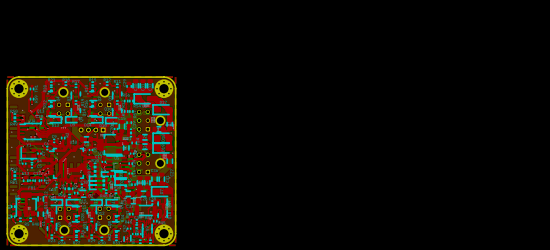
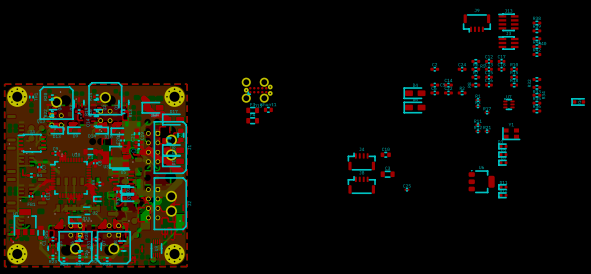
part: none -> (476, 23)
part: none -> (508, 22)
part: none -> (536, 22)
part: none -> (508, 42)
part: none -> (536, 54)
board edge: (18, 77) (163, 77) (172, 80) (175, 88) (175, 233) (172, 241) (163, 245) (18, 245) (10, 241) (7, 233) (7, 88) (10, 80) (18, 77) -> none
part footprint: [47, 81, 56, 86] -> [484, 129, 490, 133]
part footprint: [61, 81, 70, 86] -> [510, 83, 519, 87]
part footprint: [88, 81, 97, 86] -> [510, 75, 519, 80]
part footprint: [103, 81, 112, 86] -> [475, 129, 481, 133]
part: none -> (257, 90)
top track: (48, 83) (48, 88) (44, 93) (44, 102) (36, 109) (36, 115) -> none
top track: (90, 83) (90, 88) (87, 88) (78, 80) (46, 80) (45, 89) (42, 92) (42, 101) (33, 110) (30, 110) -> none
via: (100, 83) -> none
part footprint: [71, 84, 81, 88] -> [484, 111, 490, 114]
part footprint: [113, 84, 122, 88] -> [475, 123, 481, 127]
top track: (73, 85) (68, 83) (65, 87) (61, 87) (53, 97) (37, 110) (37, 115) -> none
top track: (78, 85) (78, 96) -> none
top track: (114, 85) (109, 83) (106, 87) (102, 87) (97, 92) (97, 95) (92, 95) (78, 81) (47, 81) (46, 89) (43, 92) (43, 102) (31, 111) -> none
top track: (119, 85) (119, 96) -> none
part: (135, 85) -> none
part: (142, 85) -> none
part: (150, 85) -> none
part: none -> (414, 93)
part: (129, 86) -> none
top track: (53, 88) (53, 93) -> none
top track: (95, 88) (94, 93) -> none
via: (114, 90) -> none
top track: (150, 90) (129, 89) (126, 92) (126, 98) -> none
top track: (32, 91) (32, 96) (29, 99) (29, 111) (35, 117) (44, 117) (50, 127) (61, 127) -> none
via: (87, 93) -> none
part: none -> (105, 102)
part: none -> (536, 103)
part: none -> (508, 104)
top track: (73, 96) (73, 109) (78, 113) -> none
top track: (114, 96) (114, 109) (119, 113) -> none
top track: (53, 98) (53, 108) -> none
part: none -> (56, 107)
top track: (94, 98) (94, 108) -> none
top track: (150, 98) (160, 101) (169, 110) (169, 119) -> none
part: none -> (414, 107)
part: (32, 99) -> none
part: none -> (268, 109)
top track: (32, 101) (32, 104) -> none
part: (63, 101) -> none
part: (104, 101) -> none
part: (126, 101) -> none
part: (131, 101) -> none
part: none -> (252, 110)
part: none -> (536, 111)
top track: (48, 103) (49, 116) -> none
top track: (90, 103) (90, 116) -> none
top track: (126, 103) (126, 108) (121, 115) (114, 116) (107, 124) (66, 124) (63, 127) -> none
top track: (131, 103) (129, 111) (125, 111) (121, 117) (115, 117) (107, 125) (67, 125) (65, 127) -> none
via: (32, 104) -> none
via: (79, 105) -> none
via: (119, 105) -> none
via: (120, 105) -> none
via: (77, 106) -> none
via: (79, 106) -> none
via: (84, 106) -> none
via: (120, 106) -> none
via: (79, 108) -> none
via: (119, 108) -> none
via: (120, 108) -> none
via: (77, 109) -> none
via: (79, 109) -> none
via: (119, 109) -> none
via: (120, 109) -> none
via: (30, 110) -> none
part: (75, 110) -> none
part: (117, 110) -> none
part: none -> (252, 120)
via: (31, 111) -> none
part: (126, 111) -> none
part: (131, 111) -> none
top track: (12, 112) (12, 119) -> none
via: (12, 112) -> none
bottom track: (74, 114) (74, 132) (99, 156) (99, 188) (107, 196) (102, 196) (91, 207) -> none
top track: (131, 114) (132, 122) (128, 126) (128, 135) -> none
part: (14, 115) -> none
top track: (17, 115) (24, 117) (24, 121) (19, 124) (19, 137) (24, 143) (52, 143) (56, 150) (64, 150) (64, 146) -> none
via: (36, 115) -> none
via: (37, 115) -> none
via: (46, 116) -> none
via: (47, 116) -> none
via: (87, 116) -> none
via: (89, 116) -> none
via: (79, 117) -> none
via: (151, 117) -> none
via: (153, 117) -> none
via: (154, 117) -> none
part footprint: [37, 118, 46, 123] -> [497, 67, 506, 72]
part: (14, 119) -> none
top track: (21, 119) (21, 121) (17, 124) (17, 138) (23, 144) (51, 144) (56, 151) (64, 151) (66, 146) -> none
top track: (22, 119) (17, 119) -> none
via: (22, 119) -> none
via: (79, 119) -> none
part footprint: [119, 119, 125, 133] -> [485, 75, 493, 79]
via: (151, 119) -> none
via: (153, 119) -> none
via: (154, 119) -> none
top track: (43, 120) (43, 125) (47, 128) -> none
part: (150, 120) -> none
via: (151, 120) -> none
via: (153, 120) -> none
via: (154, 120) -> none
top track: (29, 122) (25, 125) -> none
via: (151, 122) -> none
via: (154, 122) -> none
via: (47, 123) -> none
via: (49, 123) -> none
via: (89, 123) -> none
via: (90, 123) -> none
via: (93, 123) -> none
via: (169, 124) -> none
via: (170, 124) -> none
via: (173, 124) -> none
top track: (22, 125) (35, 125) (40, 131) (67, 129) (77, 139) (77, 146) -> none
via: (169, 125) -> none
via: (170, 125) -> none
via: (173, 125) -> none
via: (61, 127) -> none
via: (63, 127) -> none
via: (65, 127) -> none
via: (173, 127) -> none
via: (47, 128) -> none
via: (158, 128) -> none
via: (173, 128) -> none
top track: (22, 129) (34, 129) (39, 135) (47, 135) (50, 131) (66, 131) (69, 134) (69, 146) -> none
via: (27, 129) -> none
top track: (36, 129) (39, 133) (47, 133) (50, 130) (67, 130) (70, 134) (70, 146) -> none
via: (36, 129) -> none
top track: (163, 129) (163, 132) (169, 138) (169, 148) -> none
top track: (88, 130) (84, 141) (79, 146) -> none
part: (92, 130) -> none
top track: (95, 130) (86, 137) (86, 142) (81, 146) (81, 154) (84, 155) -> none
top track: (116, 131) (113, 133) -> none
via: (171, 132) -> none
top track: (36, 134) (39, 137) (46, 137) (51, 132) (66, 132) (67, 146) -> none
via: (36, 134) -> none
via: (95, 134) -> none
via: (100, 134) -> none
via: (102, 134) -> none
via: (100, 135) -> none
via: (102, 135) -> none
part: none -> (166, 147)
top track: (31, 136) (34, 136) -> none
via: (34, 136) -> none
part: (144, 137) -> none
top track: (31, 138) (34, 138) -> none
part rotation: 0° (63, 138) -> 90° clockwise (462, 92)
part position: (63, 138) -> (462, 92)
via: (123, 138) -> none
via: (126, 138) -> none
part footprint: [131, 138, 137, 148] -> [457, 67, 467, 72]
via: (123, 139) -> none
via: (124, 139) -> none
via: (126, 139) -> none
via: (127, 139) -> none
top track: (48, 140) (51, 140) (57, 146) -> none
via: (48, 140) -> none
part footprint: [123, 141, 130, 155] -> [444, 83, 453, 87]
part: none -> (503, 154)
via: (122, 143) -> none
top track: (126, 143) (100, 144) -> none
part footprint: [138, 143, 152, 150] -> [404, 188, 410, 192]
via: (95, 144) -> none
via: (122, 144) -> none
top track: (42, 145) (49, 152) (52, 152) -> none
top track: (23, 146) (19, 145) (17, 147) (17, 164) (26, 173) (41, 174) -> none
via: (23, 146) -> none
top track: (75, 146) (74, 150) (70, 150) (59, 161) (59, 172) (50, 181) (41, 180) (37, 188) (21, 188) (18, 191) (18, 199) -> none
top track: (76, 146) (74, 151) (71, 151) (60, 161) (60, 172) (44, 189) (21, 189) (19, 191) (18, 202) -> none
top track: (21, 147) (18, 148) (18, 164) (26, 172) (42, 172) -> none
via: (83, 147) -> none
via: (124, 147) -> none
via: (125, 147) -> none
part position: (47, 148) -> (434, 92)
part: none -> (361, 161)
via: (52, 149) -> none
top track: (33, 150) (38, 150) (46, 158) (52, 158) -> none
via: (84, 150) -> none
via: (134, 150) -> none
via: (136, 151) -> none
part position: (28, 153) -> (511, 133)
part rotation: 0° (132, 153) -> 90° clockwise (448, 92)
part position: (132, 153) -> (448, 92)
via: (172, 153) -> none
via: (89, 154) -> none
top track: (147, 154) (142, 159) (135, 159) (130, 166) (124, 165) -> none
top track: (129, 155) (132, 156) -> none
via: (129, 155) -> none
top track: (139, 155) (143, 154) (144, 156) (132, 161) (124, 161) -> none
via: (163, 155) -> none
via: (164, 155) -> none
via: (166, 155) -> none
top track: (84, 156) (109, 157) -> none
via: (129, 156) -> none
via: (163, 156) -> none
via: (164, 156) -> none
via: (166, 156) -> none
part footprint: [102, 157, 106, 166] -> [497, 59, 506, 64]
top track: (55, 158) (55, 161) (52, 162) -> none
via: (55, 158) -> none
top track: (65, 158) (66, 179) -> none
via: (65, 158) -> none
top track: (84, 158) (96, 158) (104, 168) (109, 168) -> none
via: (163, 158) -> none
via: (164, 158) -> none
via: (166, 158) -> none
part footprint: [22, 159, 26, 168] -> [380, 171, 395, 178]
top track: (52, 159) (34, 161) -> none
top track: (57, 159) (54, 164) (52, 164) -> none
via: (57, 159) -> none
top track: (64, 160) (64, 179) -> none
via: (64, 160) -> none
top track: (52, 161) (39, 161) (34, 166) -> none
top track: (63, 161) (61, 179) -> none
via: (63, 161) -> none
top track: (84, 161) (90, 161) (91, 165) -> none
part: (169, 161) -> none
top track: (84, 162) (88, 162) (92, 169) -> none
via: (88, 162) -> none
part footprint: [91, 163, 100, 167] -> [510, 67, 519, 72]
via: (113, 163) -> none
via: (115, 163) -> none
via: (116, 163) -> none
top track: (120, 163) (121, 168) (128, 168) (130, 171) -> none
part rotation: 0° (130, 163) -> 90° clockwise (536, 30)
part position: (130, 163) -> (536, 30)
part: (150, 163) -> none
top track: (84, 164) (81, 164) (77, 168) (67, 168) -> none
top track: (84, 165) (81, 165) (77, 169) (67, 170) -> none
part position: (31, 166) -> (434, 85)
bottom track: (56, 166) (56, 185) (53, 191) (22, 222) (15, 222) -> none
via: (104, 166) -> none
via: (113, 166) -> none
part: none -> (481, 181)
top track: (84, 167) (67, 171) -> none
via: (113, 167) -> none
via: (11, 168) -> none
via: (47, 168) -> none
via: (67, 168) -> none
top track: (84, 168) (67, 173) -> none
via: (27, 169) -> none
via: (43, 169) -> none
top track: (52, 169) (47, 169) (43, 174) (43, 177) (31, 177) -> none
part footprint: [128, 169, 133, 178] -> [485, 83, 493, 87]
top track: (12, 170) (12, 177) -> none
via: (12, 170) -> none
via: (67, 170) -> none
via: (81, 170) -> none
via: (105, 170) -> none
part: none -> (361, 185)
via: (39, 171) -> none
via: (48, 171) -> none
via: (67, 171) -> none
via: (42, 172) -> none
via: (80, 172) -> none
part: (14, 173) -> none
top track: (17, 173) (22, 174) -> none
via: (46, 173) -> none
via: (48, 173) -> none
via: (67, 173) -> none
part position: (95, 173) -> (475, 85)
via: (41, 174) -> none
via: (69, 174) -> none
part position: (105, 174) -> (503, 146)
part footprint: [23, 175, 29, 186] -> [485, 67, 493, 72]
part footprint: [35, 176, 40, 186] -> [485, 59, 493, 64]
part: (14, 177) -> none
top track: (22, 177) (17, 177) -> none
via: (22, 177) -> none
via: (169, 177) -> none
part: (93, 178) -> none
top track: (96, 178) (101, 178) -> none
part: (103, 178) -> none
top track: (106, 178) (106, 188) (103, 191) -> none
top track: (57, 179) (55, 180) -> none
top track: (60, 179) (60, 188) -> none
top track: (63, 179) (64, 198) (89, 197) (95, 191) (100, 196) (112, 196) (120, 185) (133, 187) -> none
top track: (70, 179) (72, 175) (80, 175) (87, 183) (90, 189) (97, 189) (101, 193) (113, 191) -> none
top track: (72, 179) (72, 176) (80, 176) (86, 184) (86, 191) -> none
top track: (79, 179) (84, 184) (82, 187) -> none
part: (154, 179) -> none
part: (161, 179) -> none
via: (55, 180) -> none
via: (128, 181) -> none
via: (129, 181) -> none
top track: (31, 182) (21, 184) -> none
via: (46, 182) -> none
top track: (96, 182) (101, 182) -> none
part: (103, 182) -> none
via: (109, 182) -> none
via: (139, 182) -> none
part: (140, 182) -> none
via: (140, 182) -> none
part: (147, 182) -> none
via: (66, 183) -> none
via: (71, 183) -> none
via: (74, 183) -> none
via: (76, 183) -> none
via: (139, 183) -> none
via: (140, 183) -> none
top track: (161, 183) (166, 183) (172, 189) (172, 213) (153, 229) (153, 241) -> none
part footprint: [77, 184, 86, 188] -> [380, 152, 391, 158]
via: (111, 184) -> none
via: (112, 184) -> none
part: (133, 184) -> none
part: (56, 185) -> none
via: (112, 185) -> none
via: (76, 186) -> none
part footprint: [151, 186, 172, 197] -> [498, 160, 508, 166]
part: (93, 187) -> none
top track: (96, 187) (101, 187) -> none
part: (103, 187) -> none
via: (112, 187) -> none
part: none -> (166, 203)
via: (60, 188) -> none
part rotation: 0° (66, 188) -> 90° clockwise (475, 69)
part position: (66, 188) -> (475, 69)
part rotation: 0° (71, 188) -> 90° clockwise (475, 77)
part position: (71, 188) -> (475, 77)
via: (111, 188) -> none
via: (112, 188) -> none
part: (125, 188) -> none
top track: (82, 189) (82, 193) (80, 193) -> none
via: (136, 189) -> none
via: (51, 190) -> none
top track: (80, 191) (75, 196) (71, 196) -> none
part: (106, 191) -> none
part: (115, 191) -> none
top track: (118, 191) (125, 201) (125, 207) (129, 211) (129, 219) (133, 224) (145, 225) (146, 222) -> none
part footprint: [37, 192, 44, 206] -> [430, 67, 440, 72]
via: (61, 192) -> none
via: (60, 193) -> none
part: (76, 193) -> none
top track: (111, 193) (101, 195) (96, 190) (91, 190) (86, 193) -> none
via: (111, 193) -> none
part: (128, 193) -> none
part: (143, 193) -> none
top track: (52, 194) (26, 194) (26, 213) -> none
via: (52, 194) -> none
top track: (83, 194) (80, 195) -> none
via: (83, 194) -> none
top track: (90, 194) (86, 195) -> none
top track: (44, 196) (45, 236) (52, 238) (57, 236) (59, 238) -> none
via: (44, 196) -> none
top track: (46, 196) (46, 221) (60, 235) (76, 235) (79, 238) (79, 233) -> none
via: (46, 196) -> none
top track: (53, 196) (61, 196) (65, 201) (65, 218) (72, 225) (76, 225) (79, 222) (89, 222) (100, 235) (116, 235) (119, 238) (119, 233) -> none
via: (64, 196) -> none
part: (69, 196) -> none
top track: (52, 197) (61, 198) (64, 201) (64, 219) (71, 226) (76, 226) (87, 238) (94, 236) (99, 238) -> none
via: (52, 197) -> none
via: (114, 197) -> none
via: (116, 197) -> none
via: (117, 197) -> none
via: (119, 197) -> none
via: (133, 197) -> none
via: (134, 197) -> none
via: (136, 197) -> none
via: (137, 197) -> none
via: (139, 197) -> none
via: (140, 197) -> none
via: (40, 198) -> none
via: (114, 198) -> none
via: (117, 198) -> none
via: (124, 198) -> none
via: (126, 198) -> none
via: (18, 199) -> none
part footprint: [50, 199, 63, 206] -> [498, 184, 508, 190]
via: (78, 199) -> none
via: (79, 199) -> none
part footprint: [90, 199, 103, 206] -> [498, 192, 508, 198]
via: (133, 200) -> none
via: (134, 200) -> none
via: (56, 201) -> none
part: (133, 201) -> none
via: (133, 201) -> none
top track: (137, 201) (131, 207) (131, 211) -> none
via: (146, 201) -> none
top track: (159, 201) (152, 201) (152, 205) (148, 209) (148, 222) -> none
part footprint: [11, 202, 15, 211] -> [475, 98, 481, 102]
via: (18, 202) -> none
via: (55, 202) -> none
part position: (112, 202) -> (578, 101)
via: (146, 202) -> none
part: (152, 202) -> none
top track: (13, 203) (26, 203) -> none
via: (146, 203) -> none
part: (162, 203) -> none
via: (169, 204) -> none
via: (104, 205) -> none
top zone outline: (24, 206) (30, 206) (28, 216) (24, 216) (24, 206) -> none
via: (81, 206) -> none
via: (121, 206) -> none
via: (166, 206) -> none
via: (167, 206) -> none
via: (28, 207) -> none
via: (29, 207) -> none
via: (166, 207) -> none
via: (167, 207) -> none
via: (28, 209) -> none
top track: (49, 209) (54, 212) (54, 225) -> none
top track: (89, 209) (94, 212) (94, 225) -> none
via: (167, 209) -> none
part: (145, 210) -> none
part: (51, 211) -> none
part: (77, 211) -> none
part: (91, 211) -> none
part: (117, 211) -> none
part footprint: [11, 212, 15, 221] -> [475, 104, 481, 108]
via: (48, 212) -> none
via: (50, 212) -> none
via: (88, 212) -> none
via: (90, 212) -> none
via: (140, 212) -> none
via: (141, 212) -> none
via: (142, 212) -> none
top track: (159, 212) (159, 217) (156, 220) (148, 218) -> none
top track: (32, 213) (40, 218) (40, 226) -> none
via: (48, 214) -> none
via: (50, 214) -> none
via: (88, 214) -> none
part rotation: 0° (131, 214) -> 90° clockwise (536, 46)
part position: (131, 214) -> (536, 46)
via: (141, 214) -> none
via: (48, 215) -> none
via: (50, 215) -> none
via: (88, 215) -> none
via: (90, 215) -> none
part: (162, 215) -> none
top track: (131, 216) (144, 222) -> none
via: (48, 217) -> none
via: (88, 217) -> none
via: (141, 217) -> none
via: (165, 217) -> none
part position: (116, 218) -> (536, 95)
part position: (20, 219) -> (475, 61)
top track: (23, 219) (27, 219) -> none
part position: (30, 219) -> (536, 38)
via: (131, 219) -> none
top track: (150, 219) (150, 222) -> none
via: (150, 219) -> none
part: (64, 220) -> none
part: (104, 220) -> none
part: (136, 221) -> none
part: (155, 221) -> none
via: (40, 222) -> none
via: (128, 222) -> none
via: (159, 222) -> none
top track: (155, 223) (144, 232) (144, 234) -> none
part: none -> (75, 243)
part: none -> (113, 243)
via: (40, 225) -> none
top track: (49, 225) (49, 236) -> none
top track: (89, 225) (89, 236) -> none
via: (40, 226) -> none
part: (136, 226) -> none
via: (110, 227) -> none
via: (120, 228) -> none
part: (129, 228) -> none
top track: (74, 229) (73, 233) -> none
top track: (114, 229) (113, 233) -> none
top track: (126, 230) (129, 231) (129, 236) -> none
via: (126, 230) -> none
via: (94, 232) -> none
part position: (116, 233) -> (536, 79)
part: (134, 234) -> none
part: (139, 234) -> none
top track: (146, 234) (145, 237) (134, 236) -> none
top track: (148, 234) (148, 241) (142, 241) (144, 239) -> none
top track: (150, 234) (150, 238) -> none
via: (109, 238) -> none
part position: (116, 238) -> (536, 87)
part: (127, 238) -> none
via: (127, 238) -> none
via: (150, 238) -> none
via: (69, 239) -> none
via: (127, 239) -> none
via: (144, 239) -> none
via: (121, 241) -> none
top track: (129, 241) (137, 241) -> none
part: (140, 241) -> none
part: (150, 241) -> none

